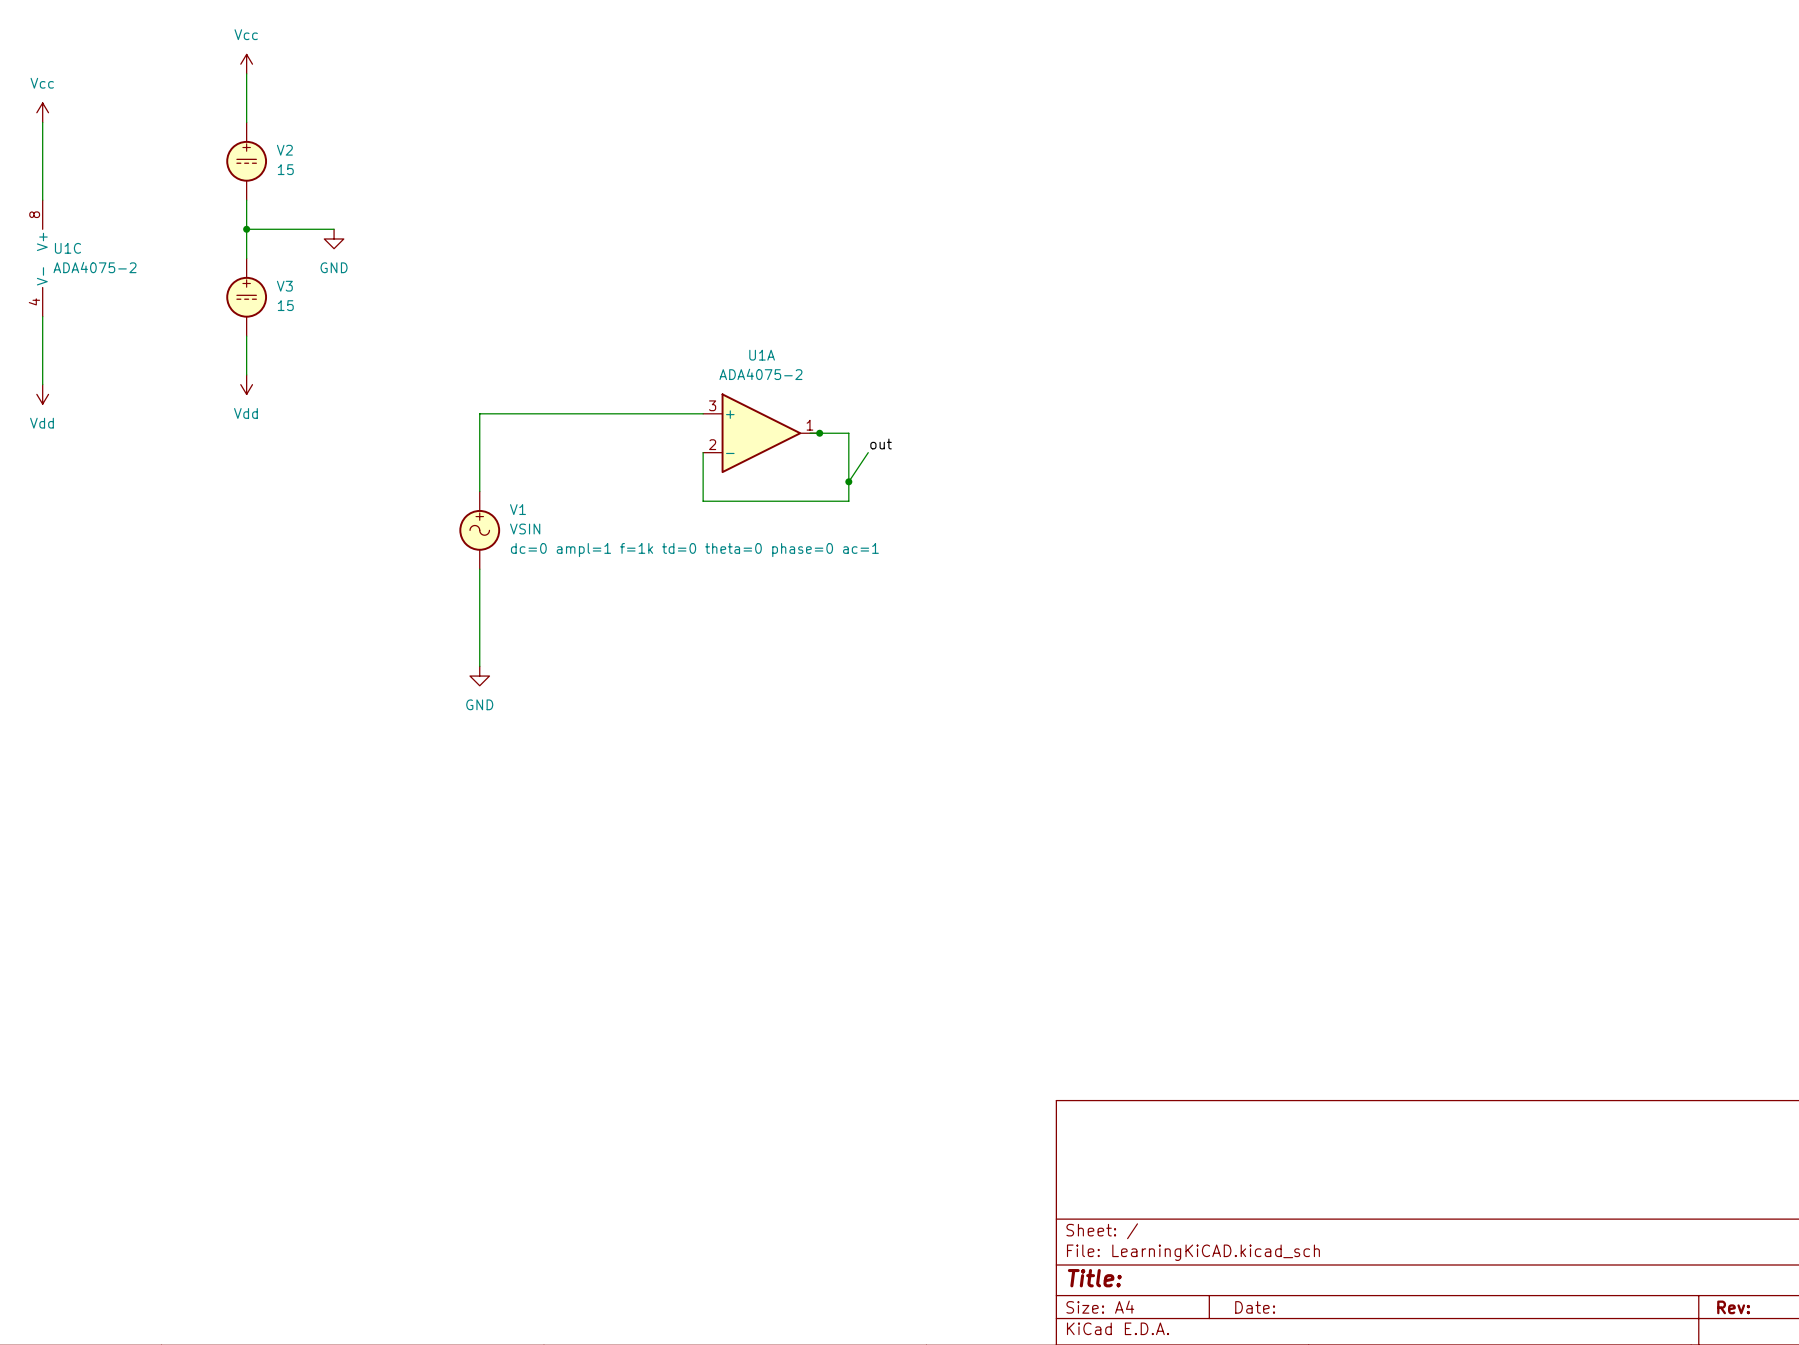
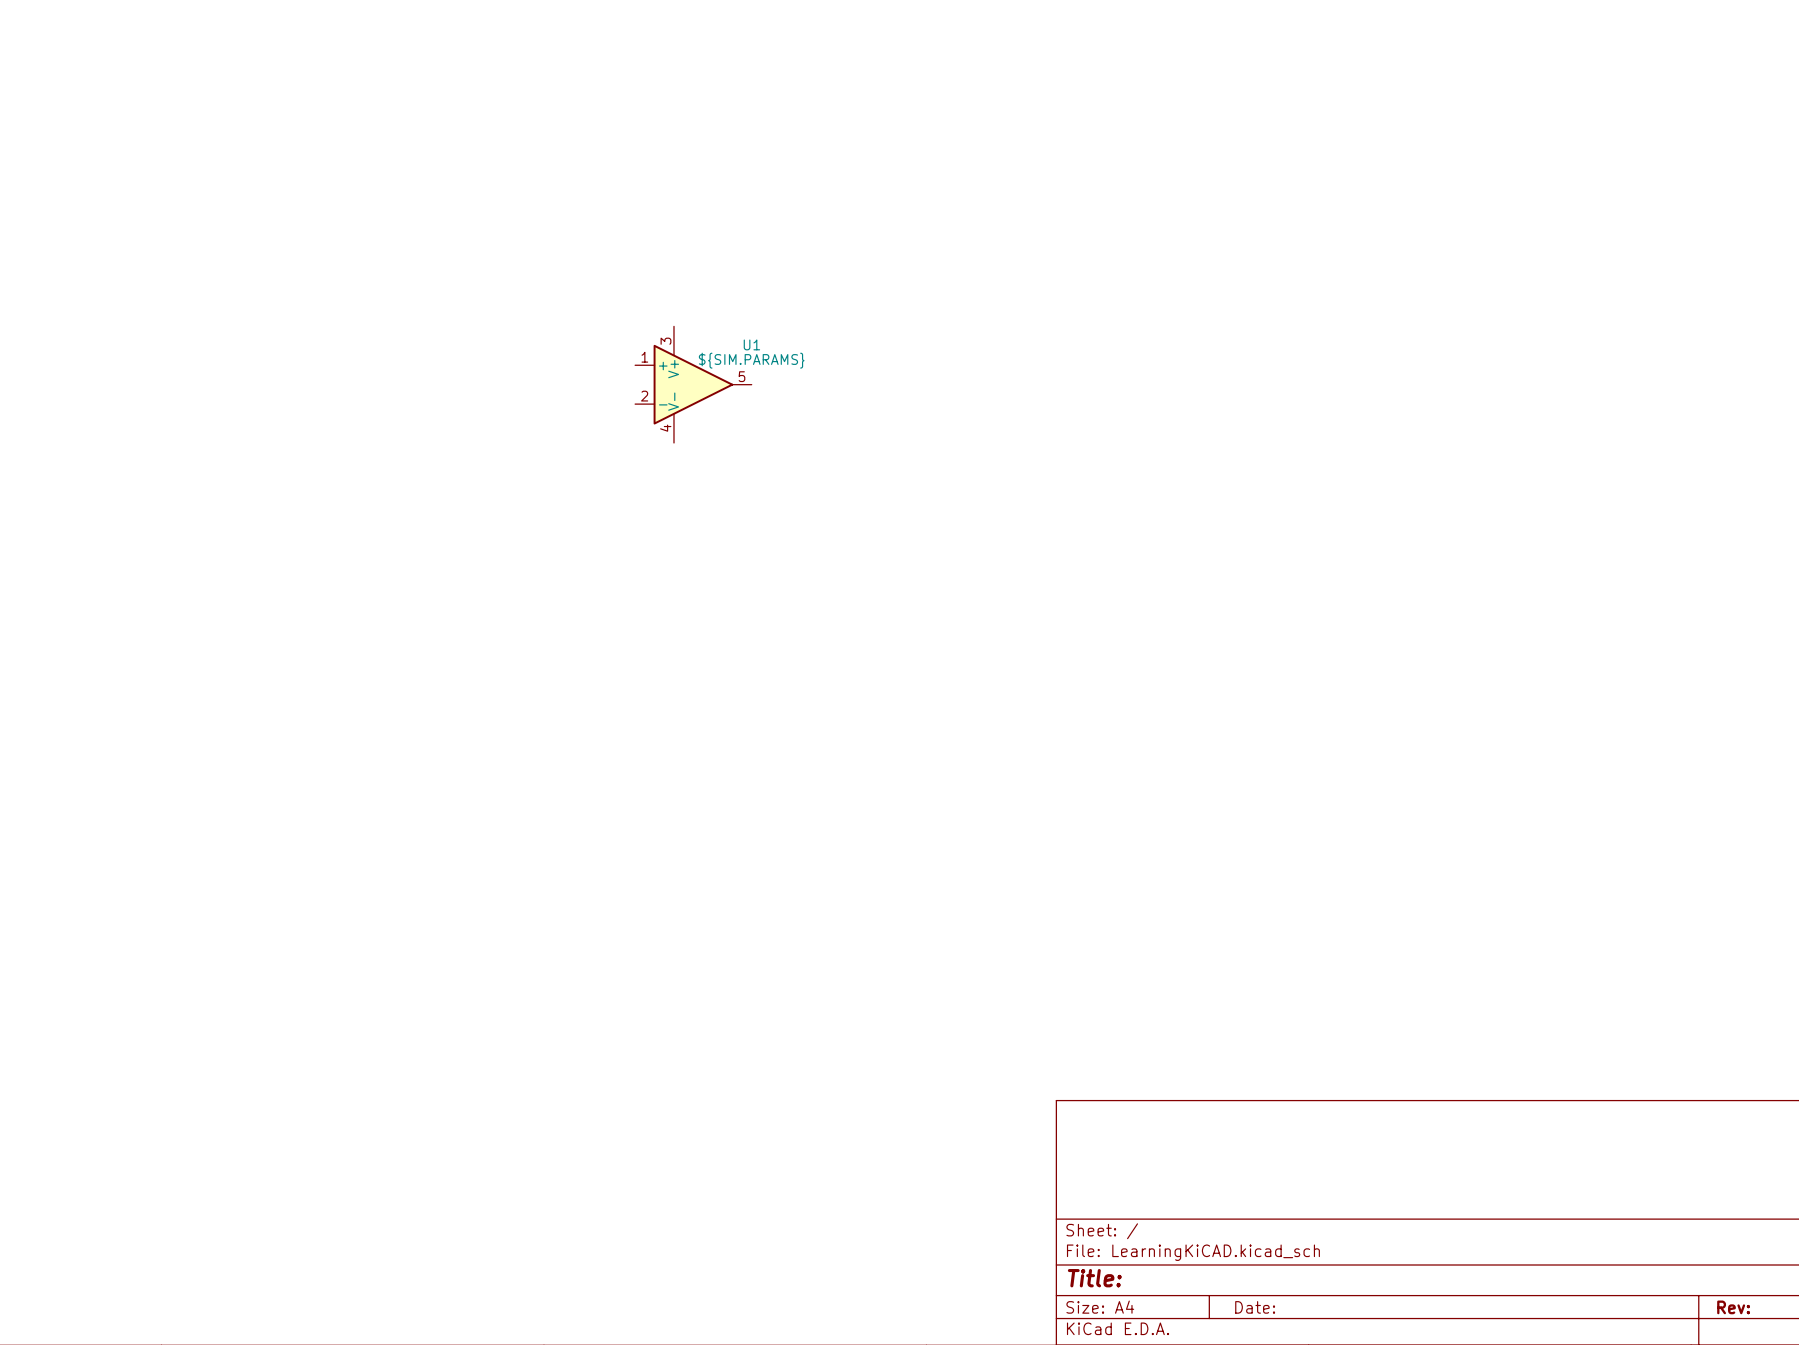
power symbol: Vcc (246, 64) -> none
wire: (246, 73) (246, 122) -> none
power symbol: Vcc (42, 112) -> none
wire: (42, 122) (42, 200) -> none
V2: 15 (246, 161) -> none
wire: (246, 200) (246, 258) -> none
wire: (246, 229) (334, 229) -> none
junction: (246, 229) -> none
power symbol: GND (334, 238) -> none
U1C: ADA4075-2 (42, 258) -> none
V3: 15 (246, 297) -> none
wire: (42, 316) (42, 384) -> none
wire: (246, 336) (246, 374) -> none
power symbol: Vdd (246, 384) -> none
U1: none -> ${SIM.PARAMS} (693, 384)
power symbol: Vdd (42, 394) -> none
wire: (703, 413) (479, 413) (479, 491) -> none
U1A: ADA4075-2 (761, 433) -> none
wire: (809, 433) (848, 433) (848, 501) (703, 501) (703, 452) -> none
junction: (819, 433) -> none
label: out (881, 444) -> none
wire: (868, 452) (848, 481) -> none
junction: (848, 481) -> none
V1: VSIN (479, 530) -> none
wire: (479, 569) (479, 666) -> none
power symbol: GND (479, 676) -> none

